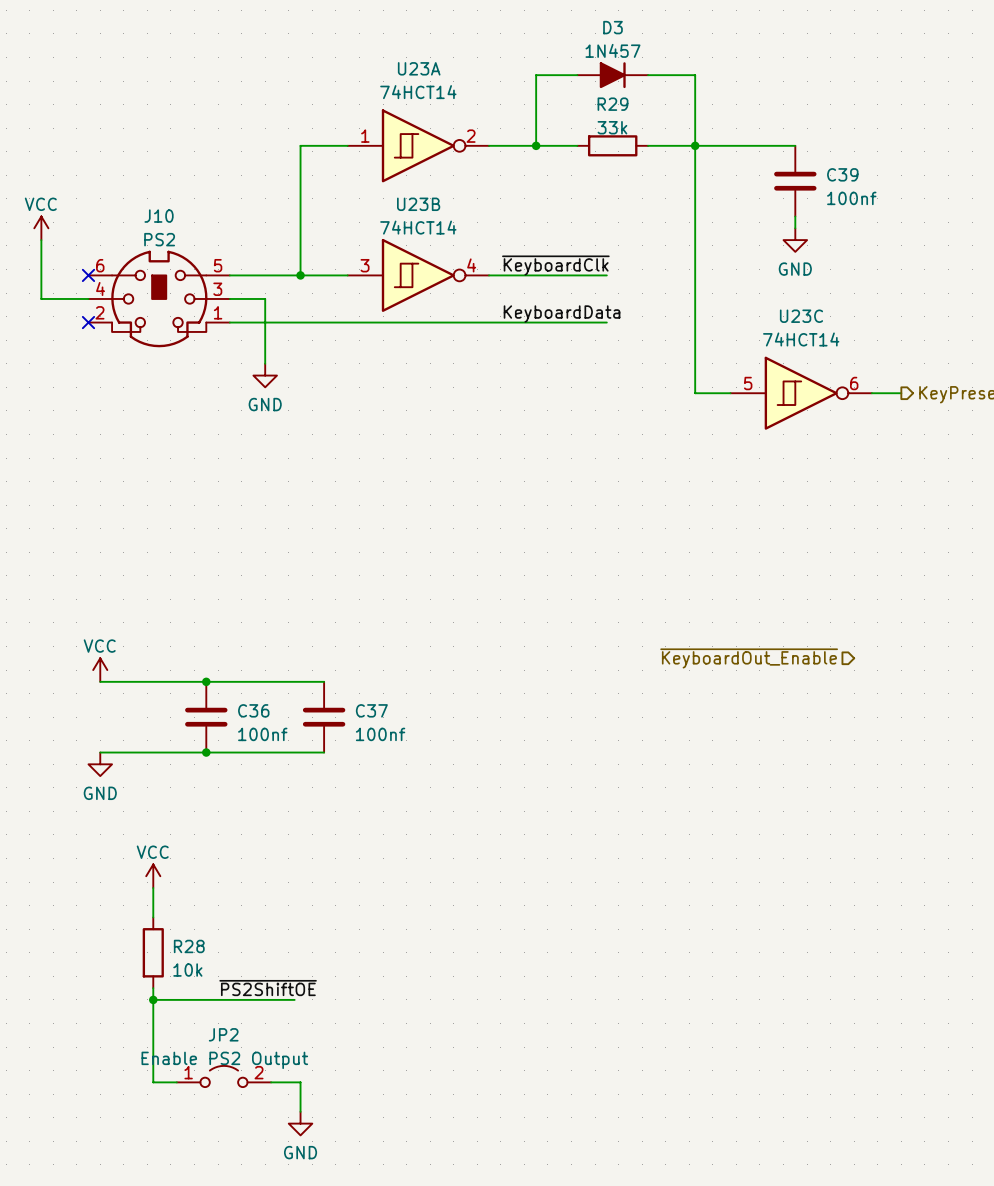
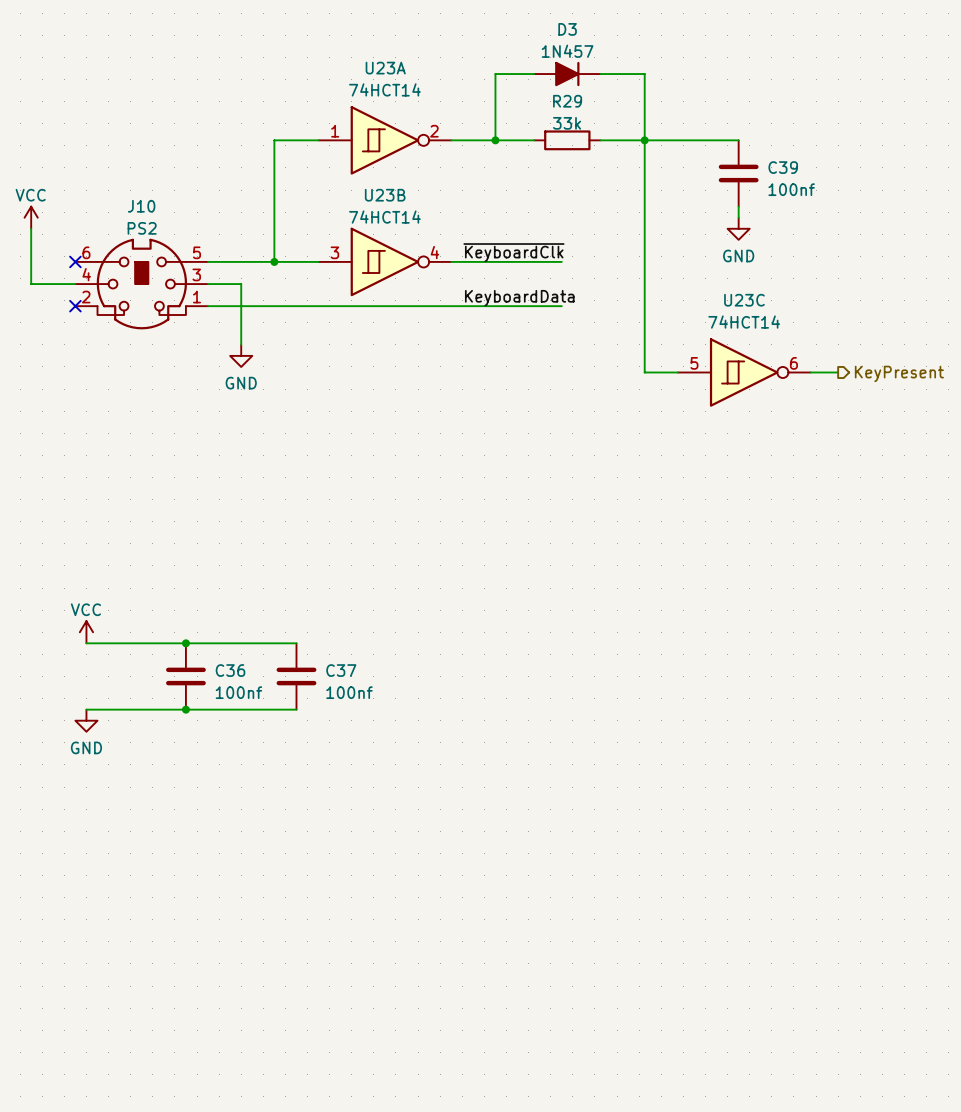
hierarchical label: ~{KeyboardOut_Enable} (749, 658) -> none
power symbol: VCC (153, 876) -> none
wire: (153, 888) (153, 917) -> none
R28: 10k (153, 952) -> none
wire: (153, 988) (153, 1082) (176, 1082) -> none
label: ~{PS2ShiftOE} (268, 988) -> none
wire: (153, 999) (294, 999) -> none
junction: (153, 999) -> none
JP2: Enable PS2 Output (223, 1076) -> none
wire: (271, 1082) (300, 1082) (300, 1111) -> none
power symbol: GND (300, 1123) -> none

